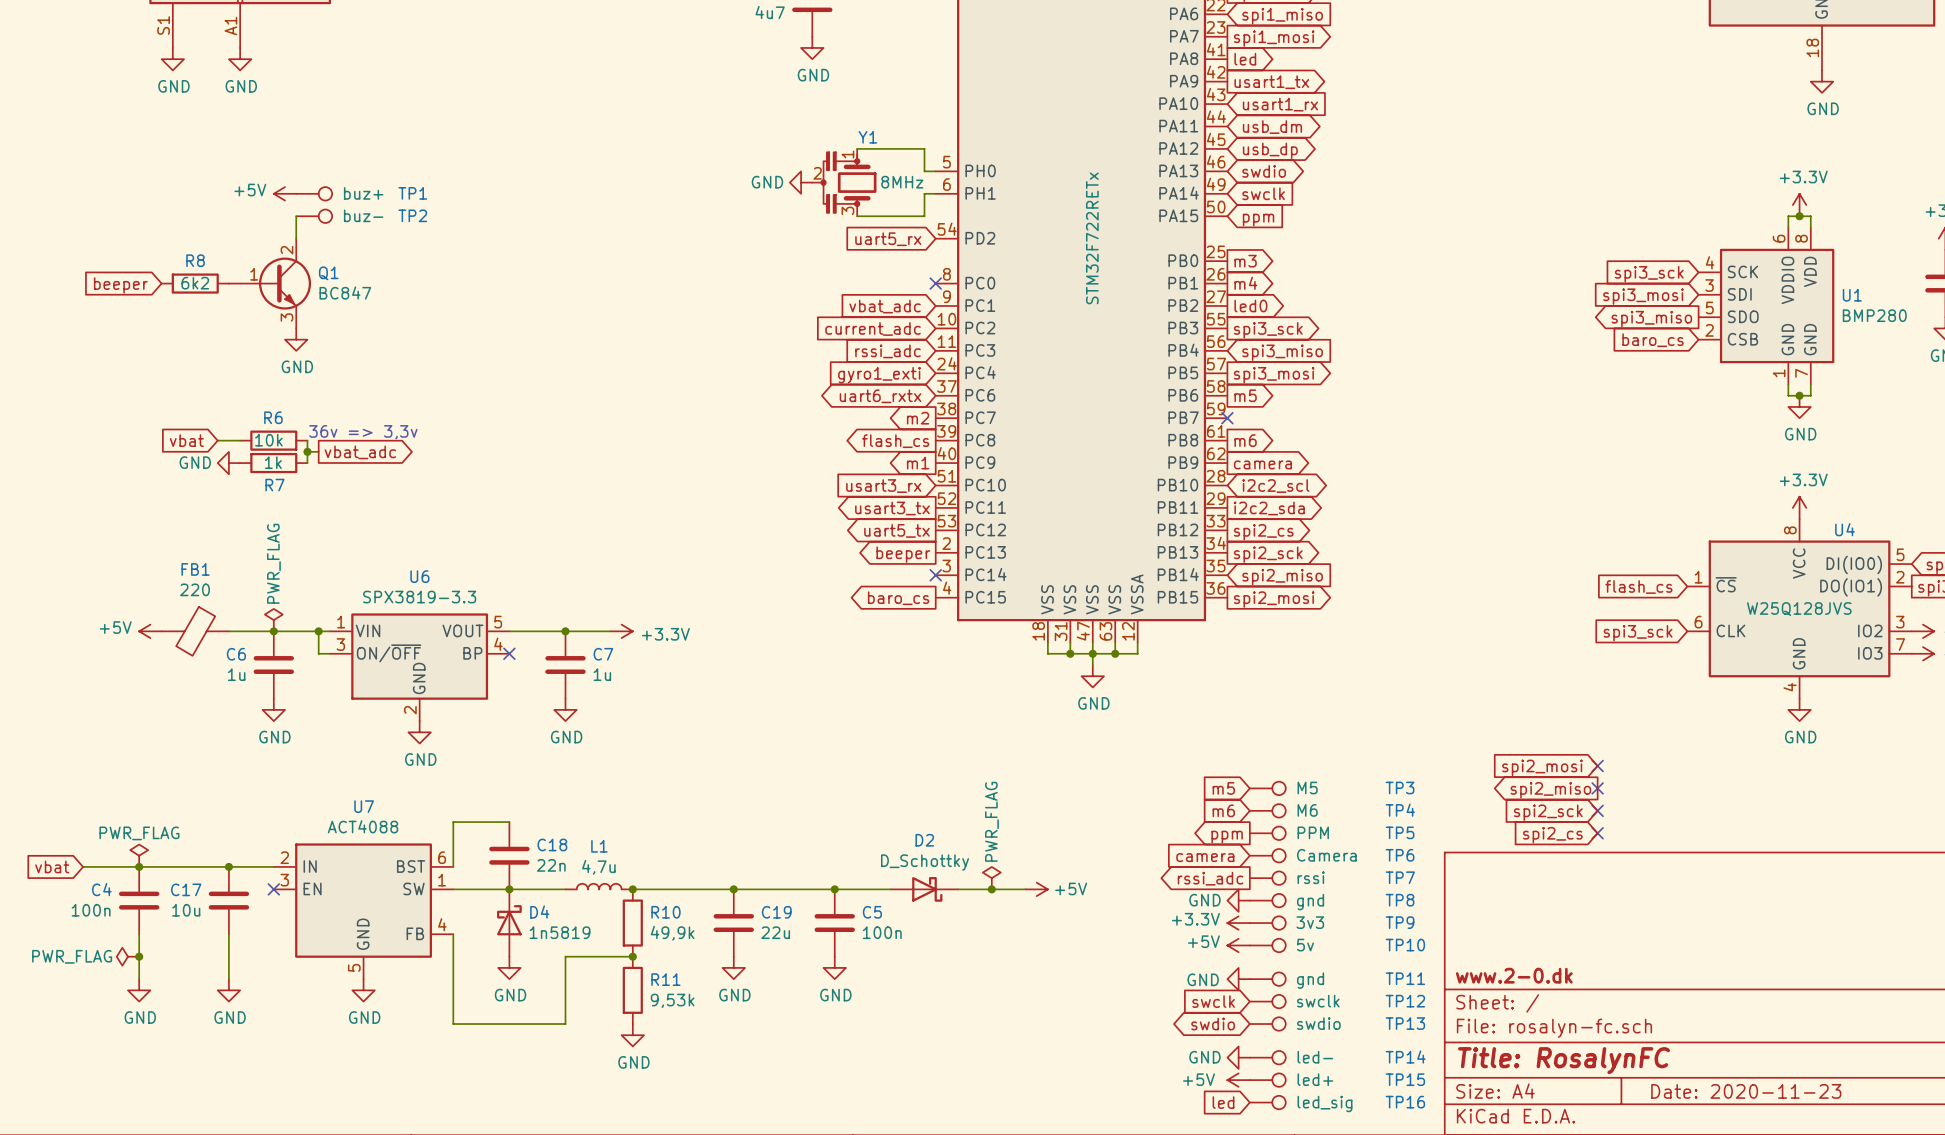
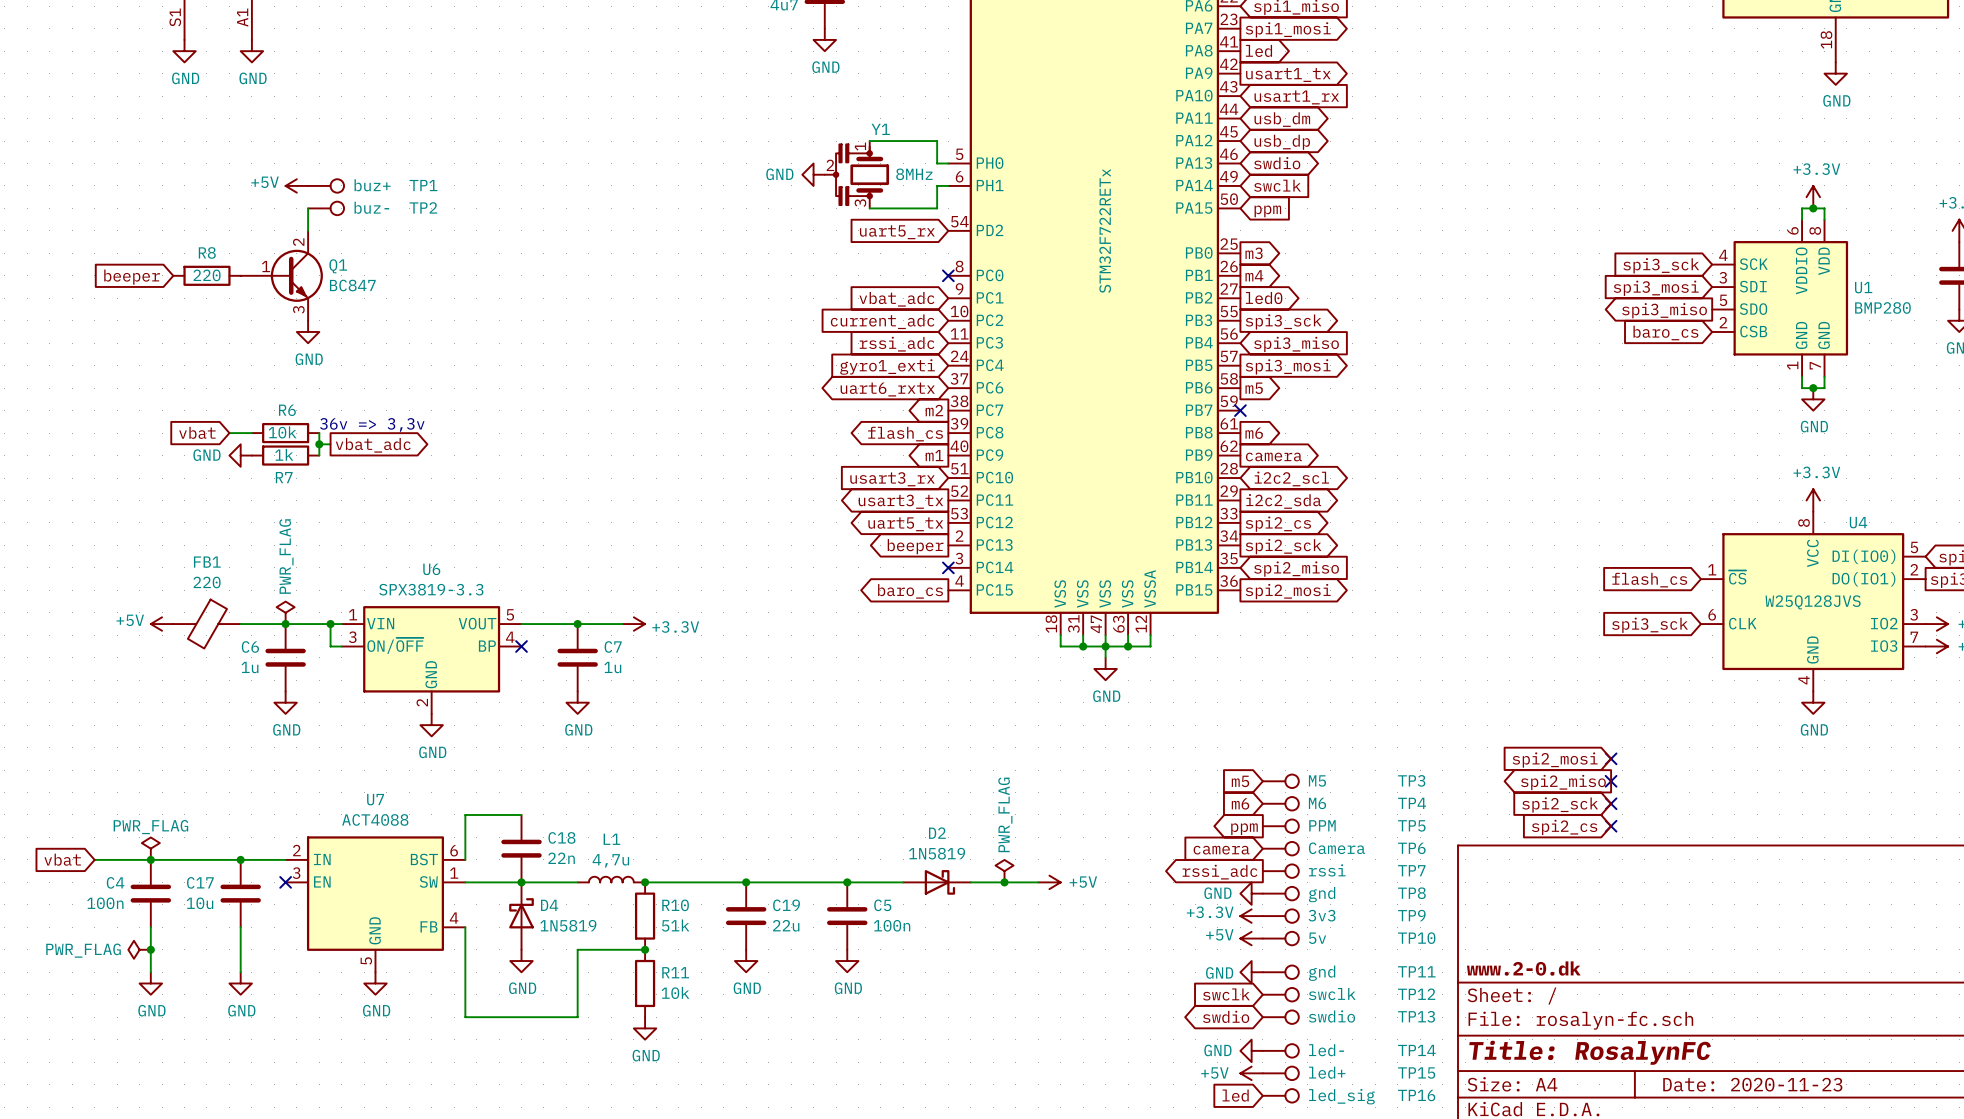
R8 value: 6k2 (195, 283) -> 220 (207, 275)
D2 value: D_Schottky (925, 862) -> 1N5819 (937, 853)
D4 value: 1n5819 (560, 932) -> 1N5819 (568, 925)
R10 value: 49,9k (672, 933) -> 51k (675, 925)
R11 value: 9,53k (672, 1000) -> 10k (675, 992)

